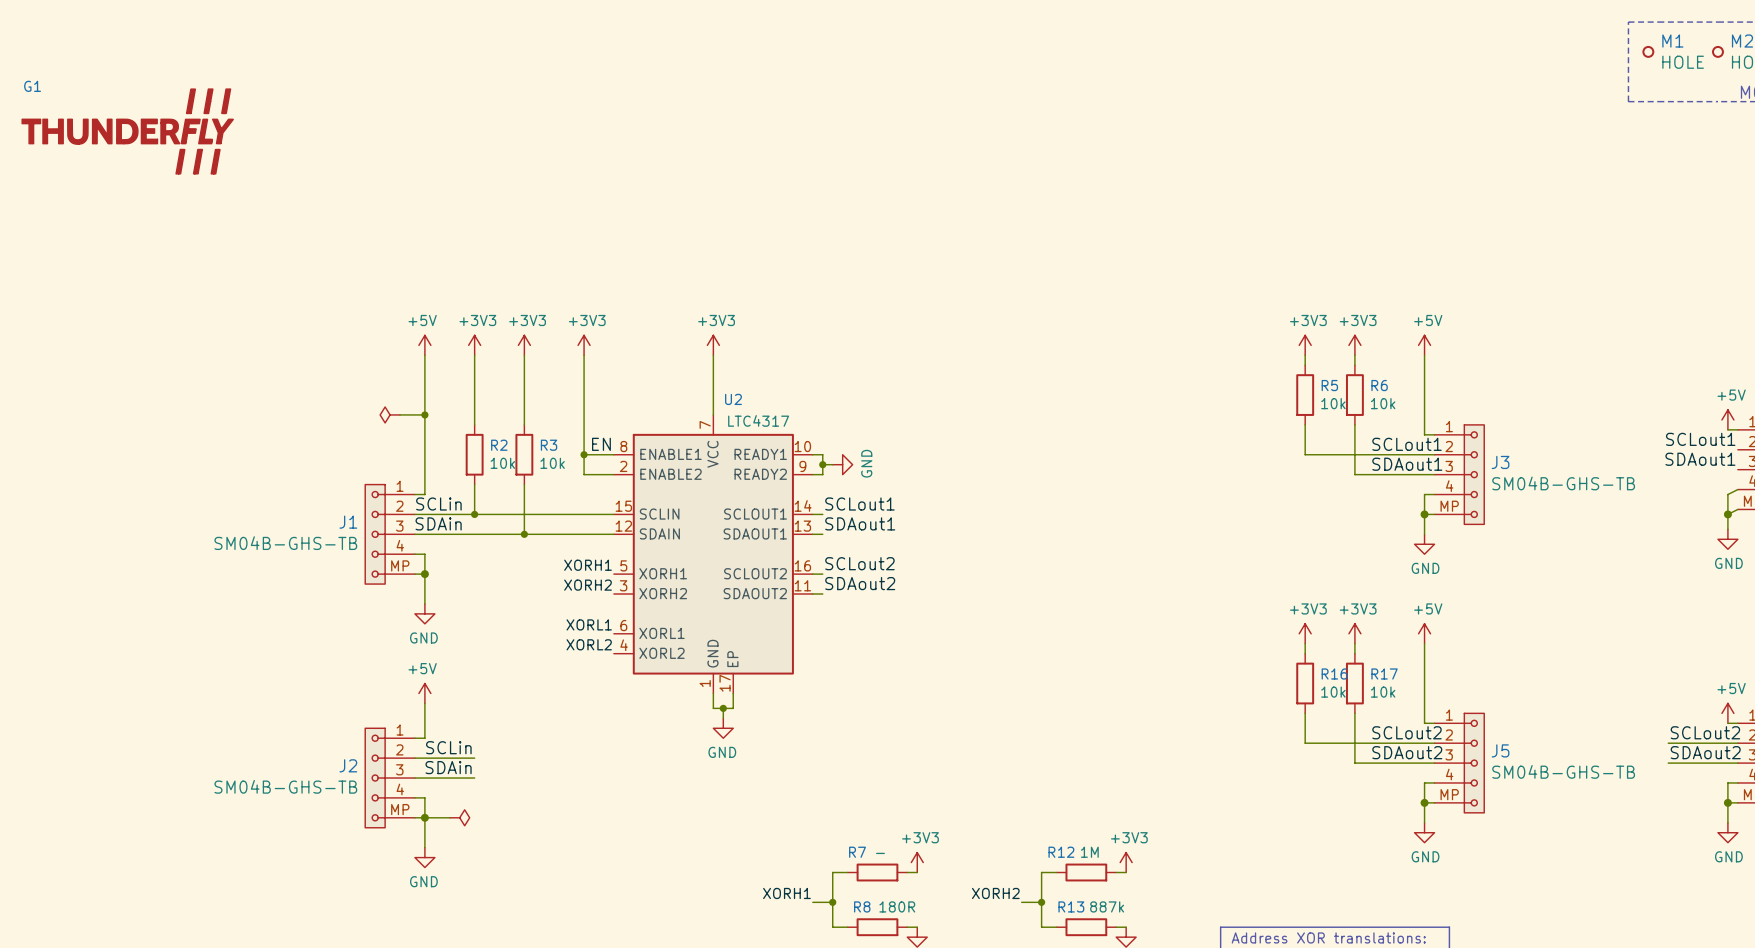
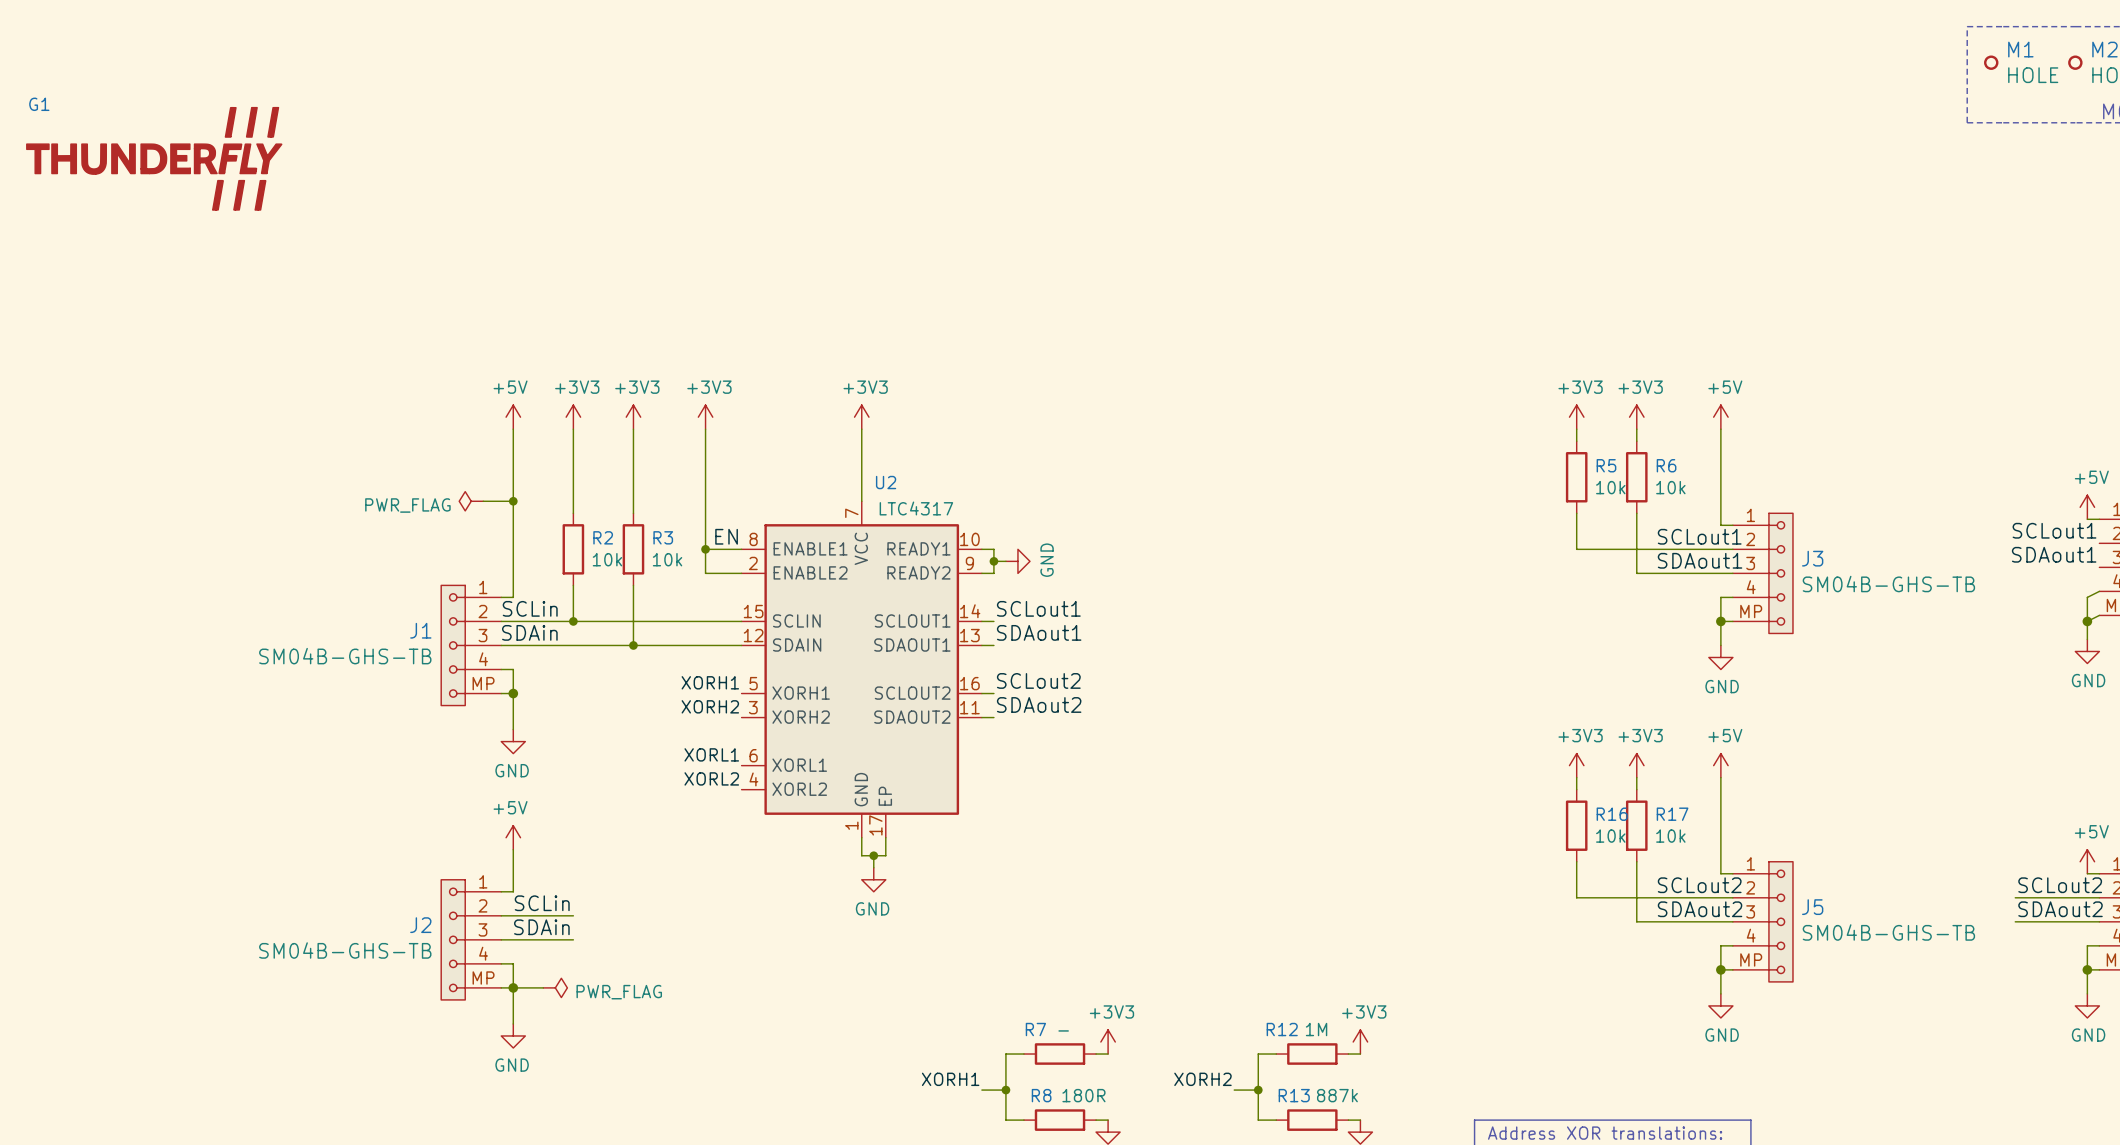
power symbol text: none -> PWR_FLAG (407, 505)
power symbol text: none -> PWR_FLAG (619, 992)

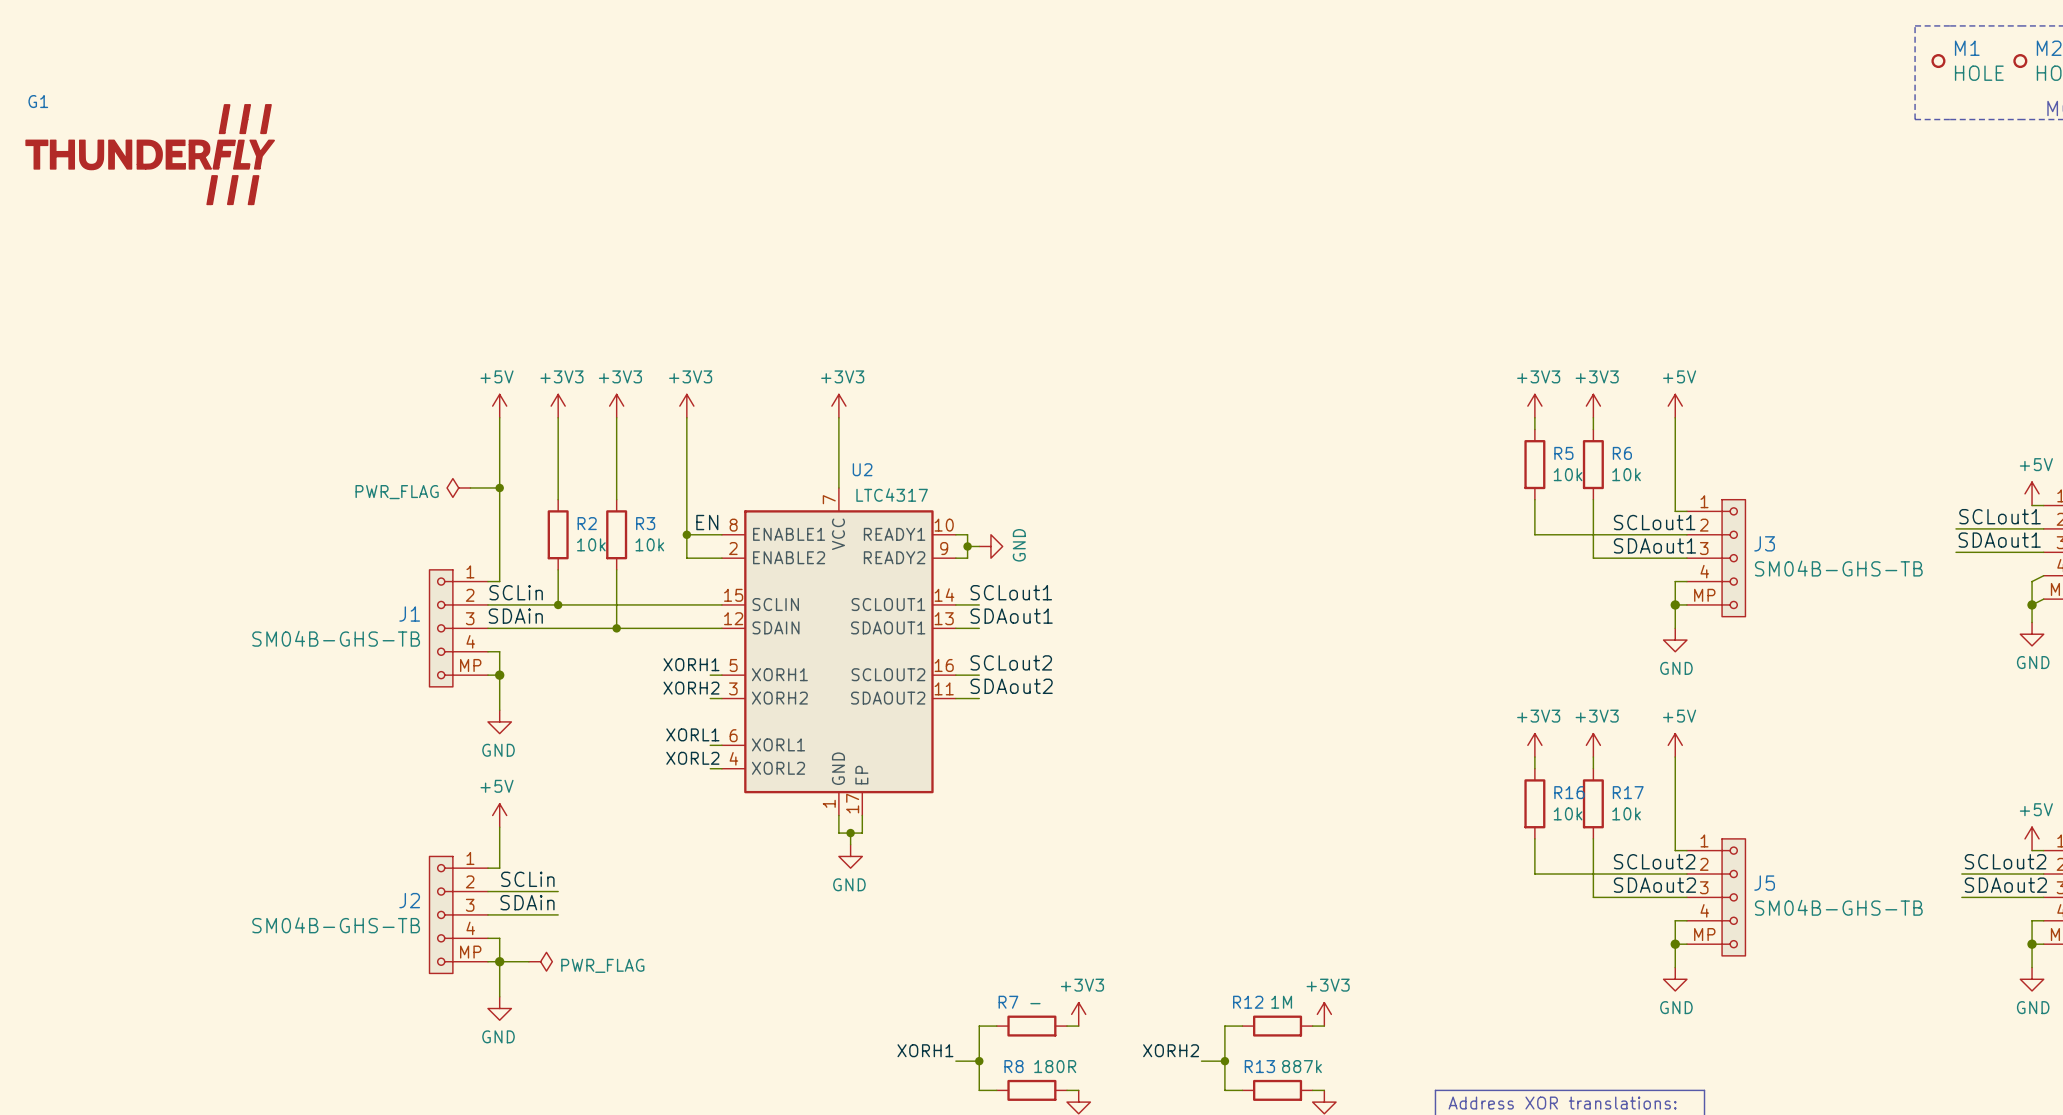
wire: none -> (1955, 528) (2043, 528)
wire: none -> (1955, 552) (2043, 552)
wire: none -> (967, 604) (979, 604)
wire: none -> (967, 628) (979, 628)
wire: none -> (710, 675) (721, 675)
wire: none -> (967, 675) (979, 675)
wire: none -> (710, 698) (721, 698)
wire: none -> (967, 698) (979, 698)
wire: none -> (710, 745) (721, 745)
wire: none -> (710, 768) (721, 768)

